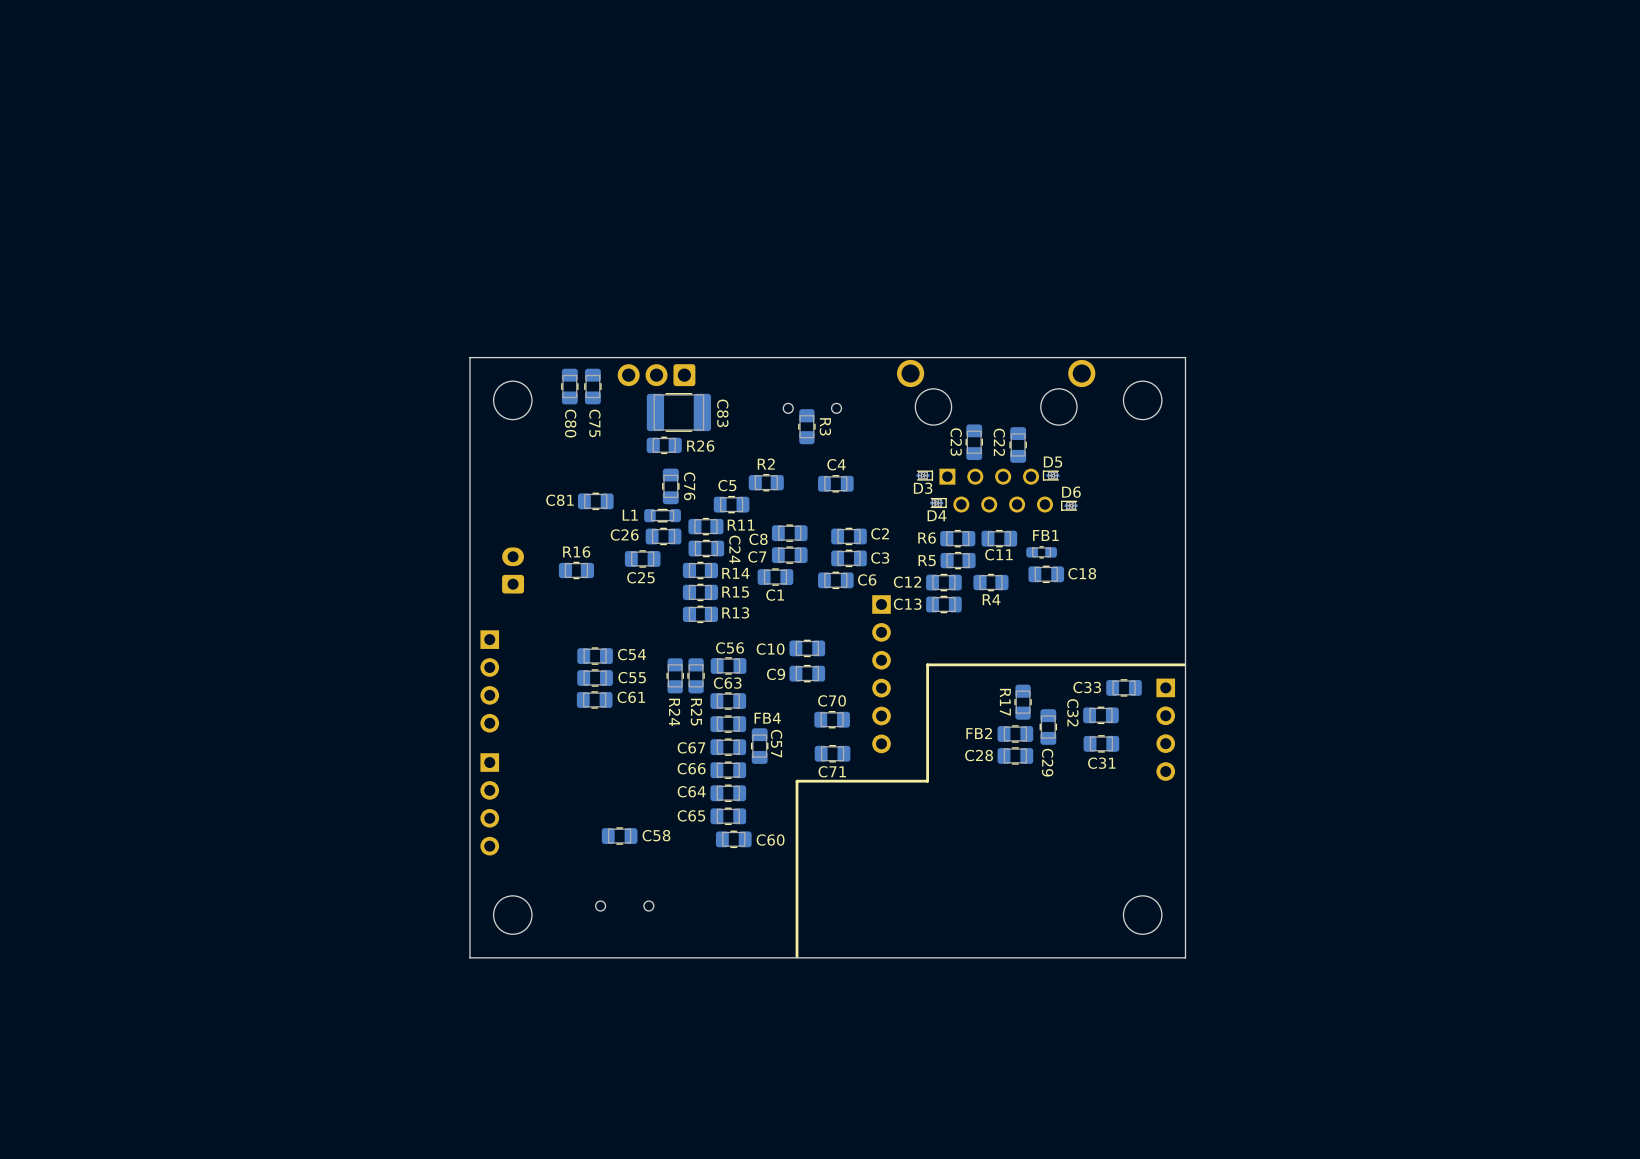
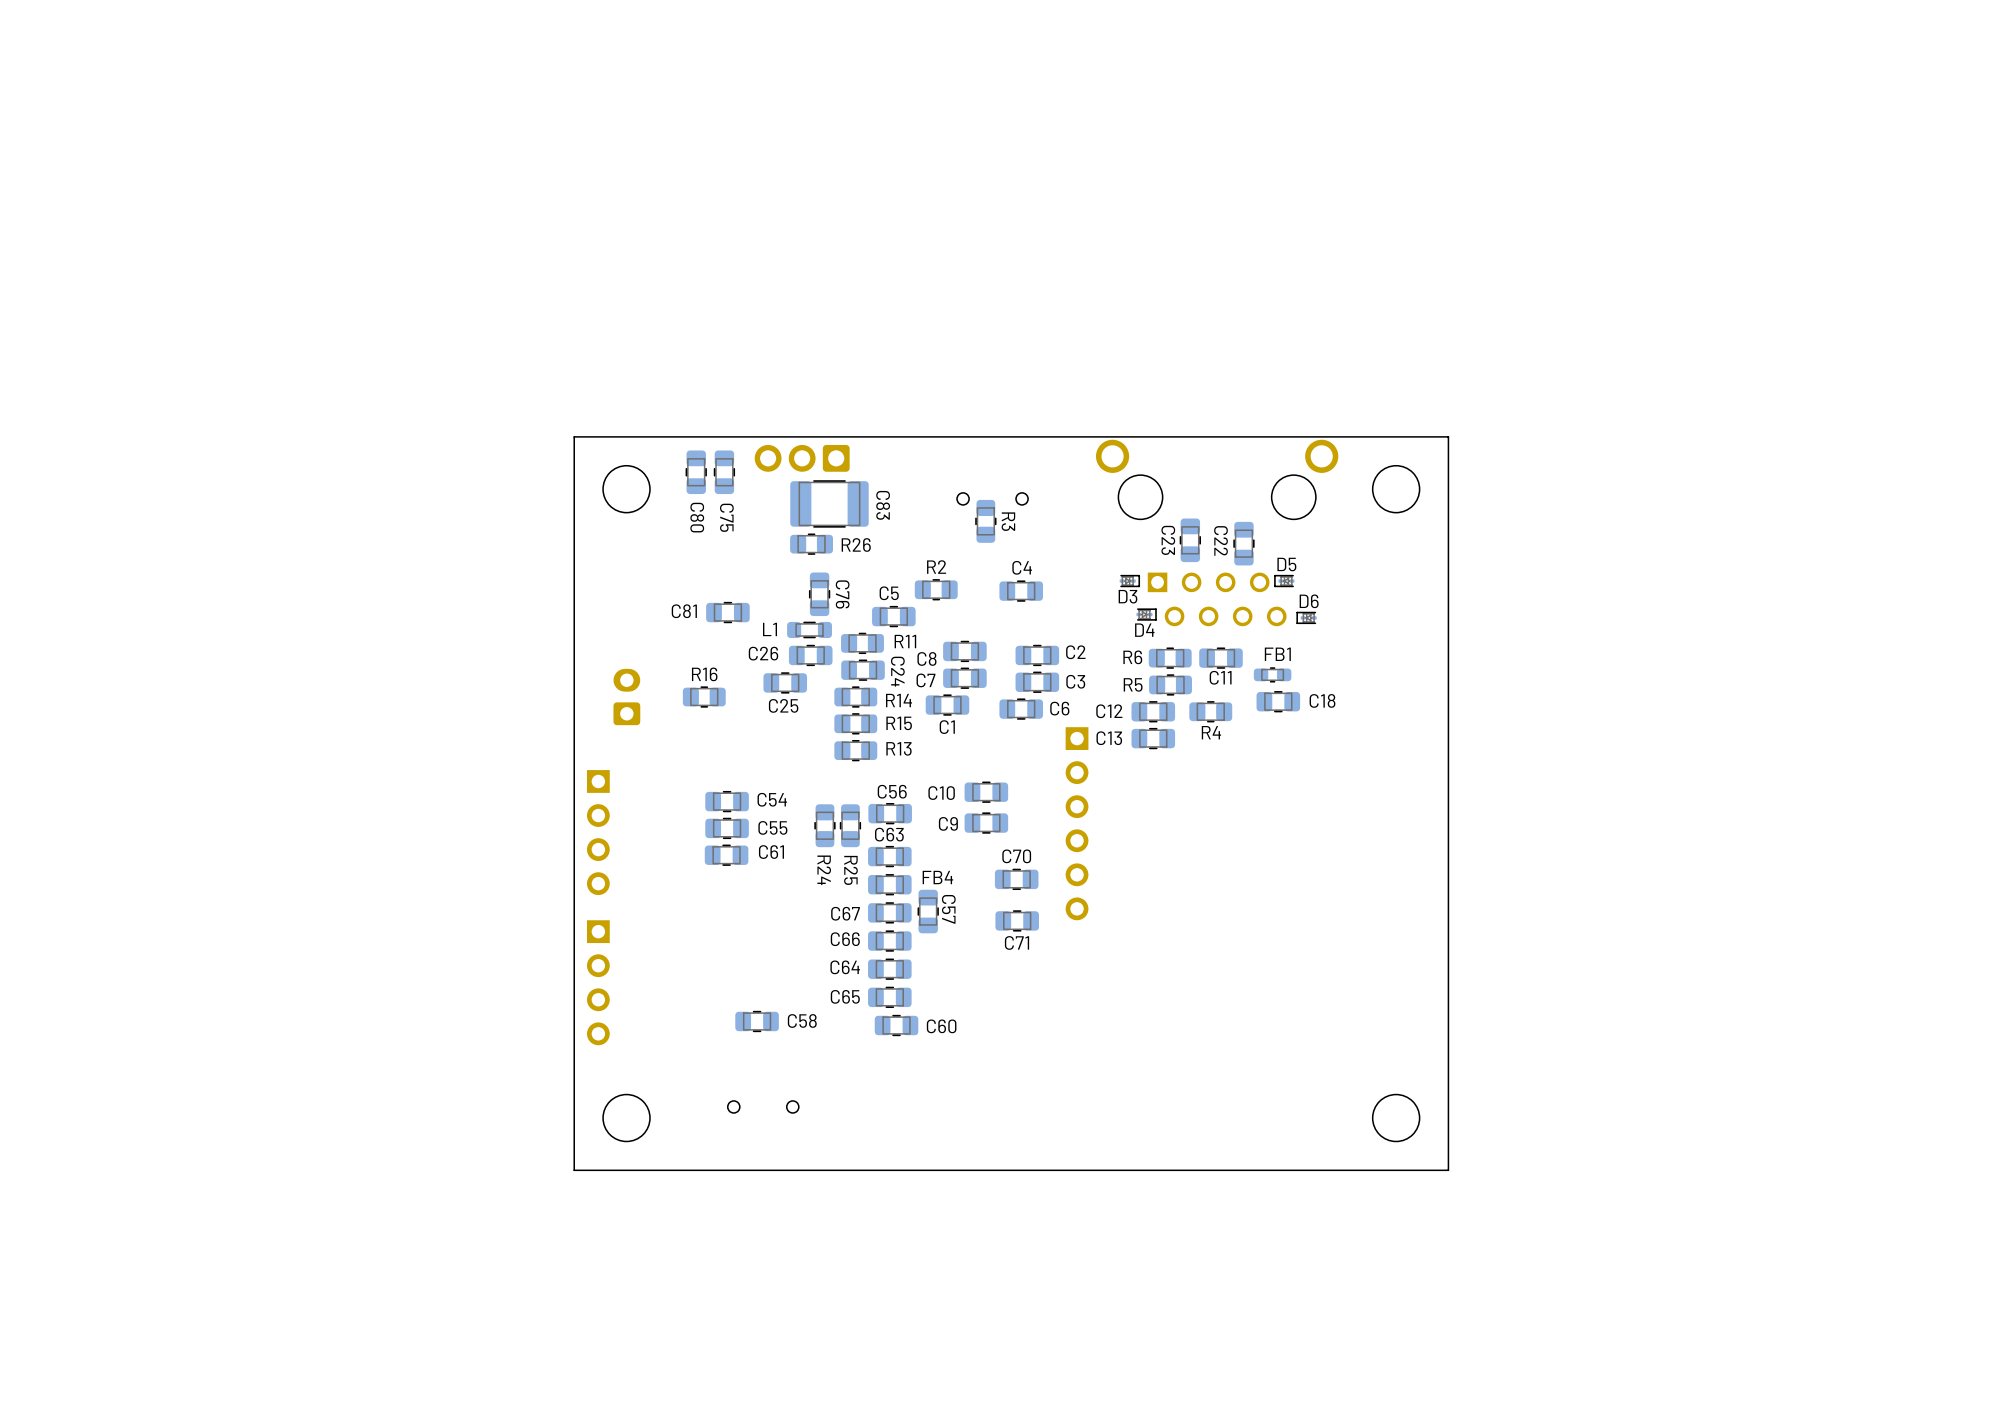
line: (1184, 664) (927, 664) (927, 781) (797, 781) (797, 956) -> none
C33: (1124, 687) -> none
R17: (1023, 702) -> none
C32: (1100, 715) -> none
C29: (1048, 727) -> none
part: (1165, 729) -> none
FB2: (1015, 733) -> none
C31: (1101, 743) -> none
C28: (1015, 755) -> none

